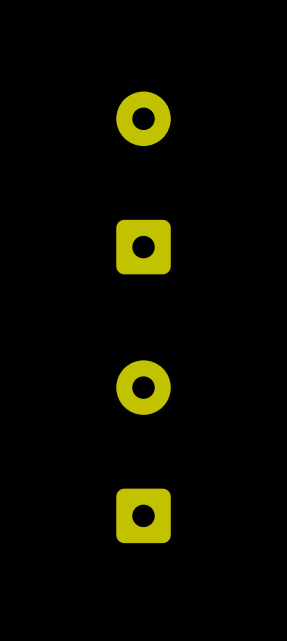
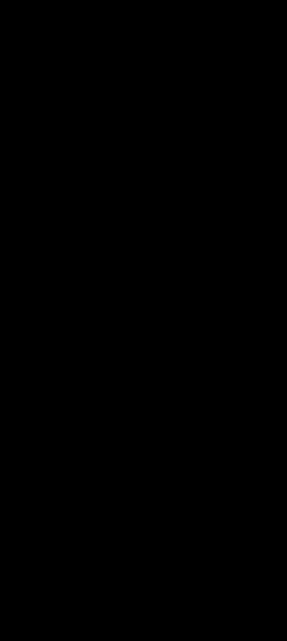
part: (143, 182) -> none
part: (143, 451) -> none

